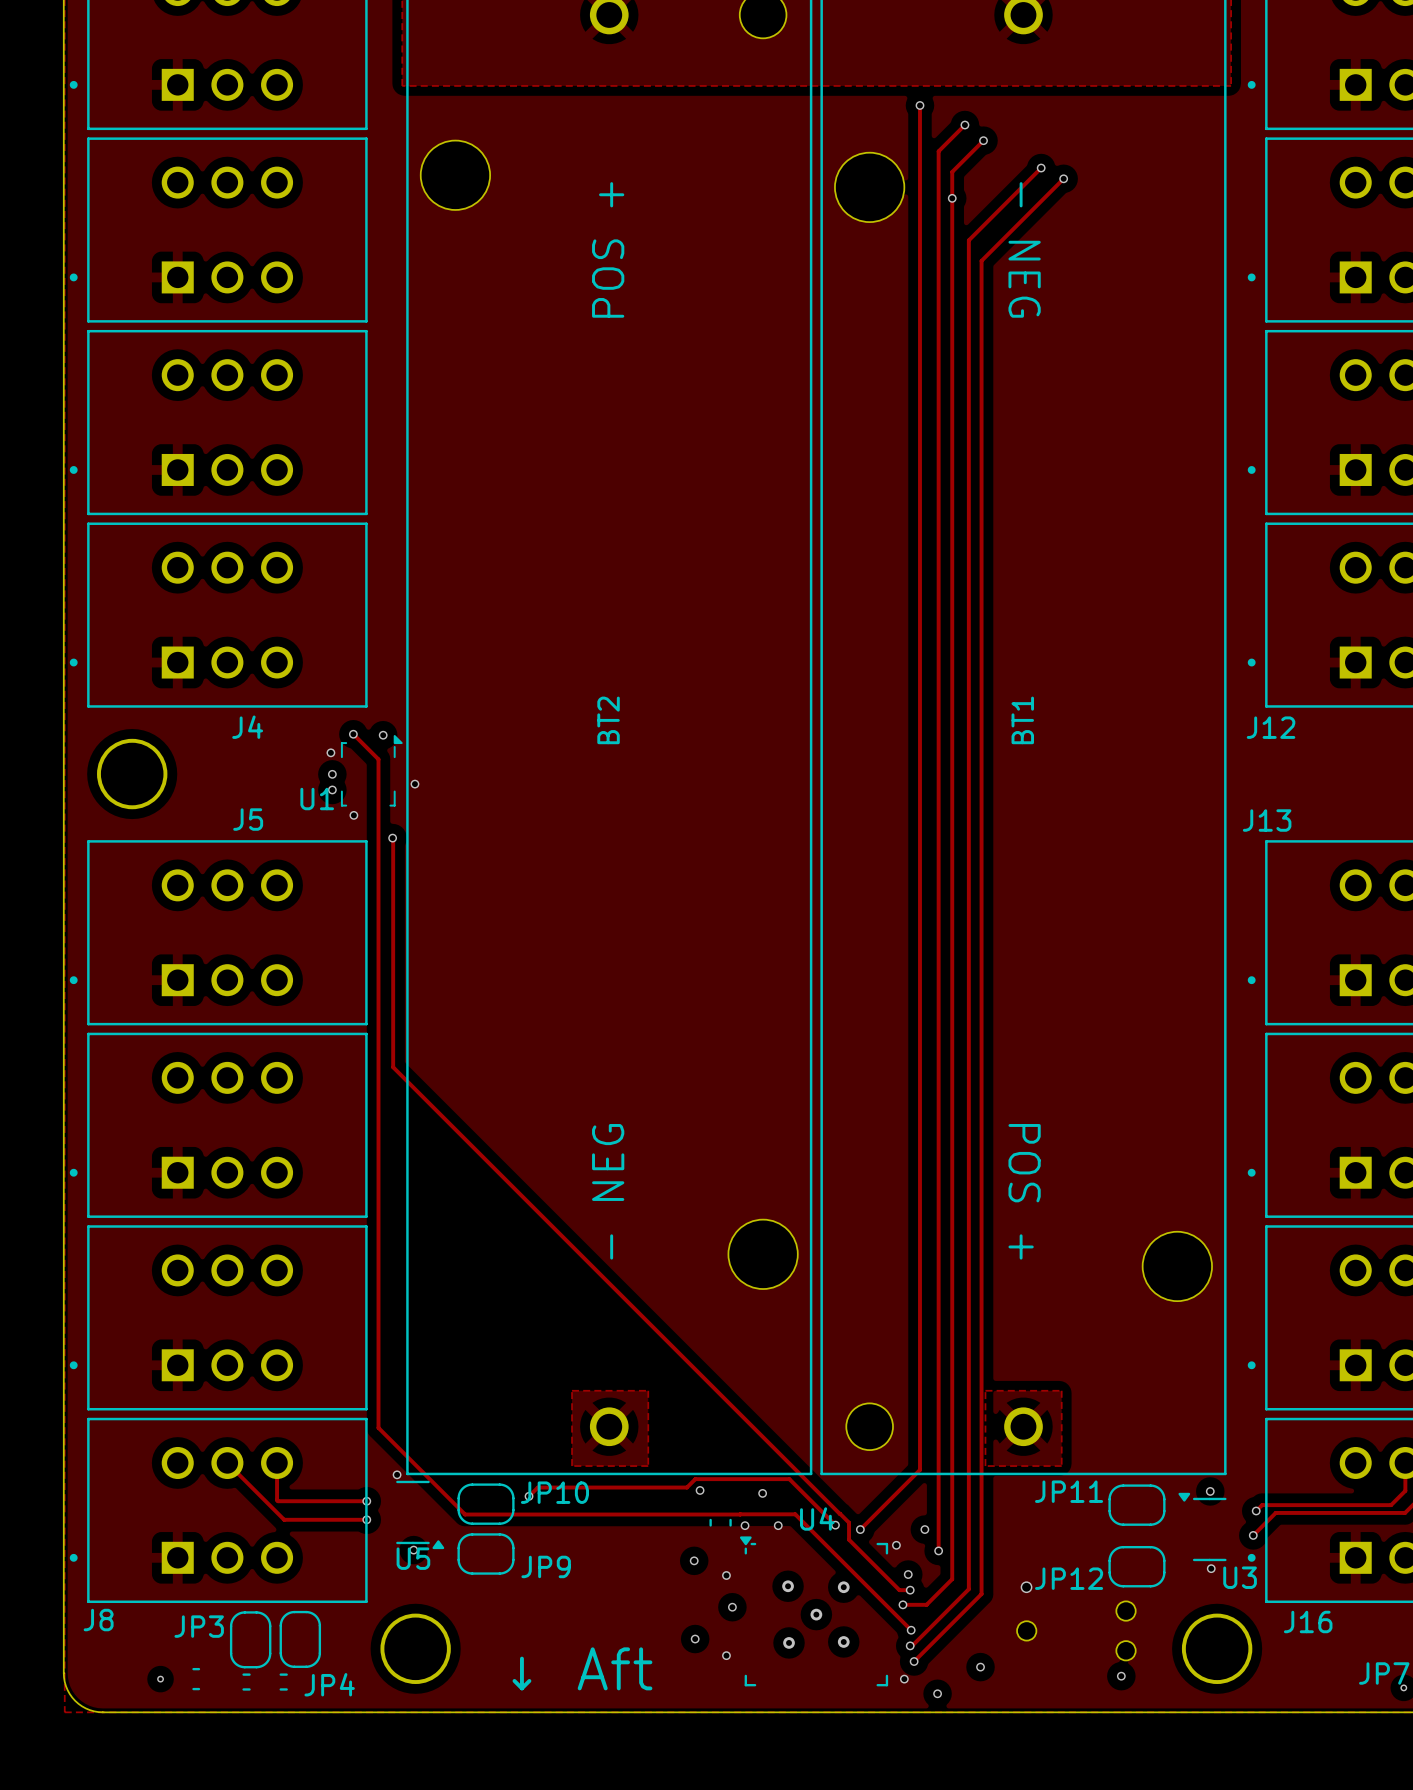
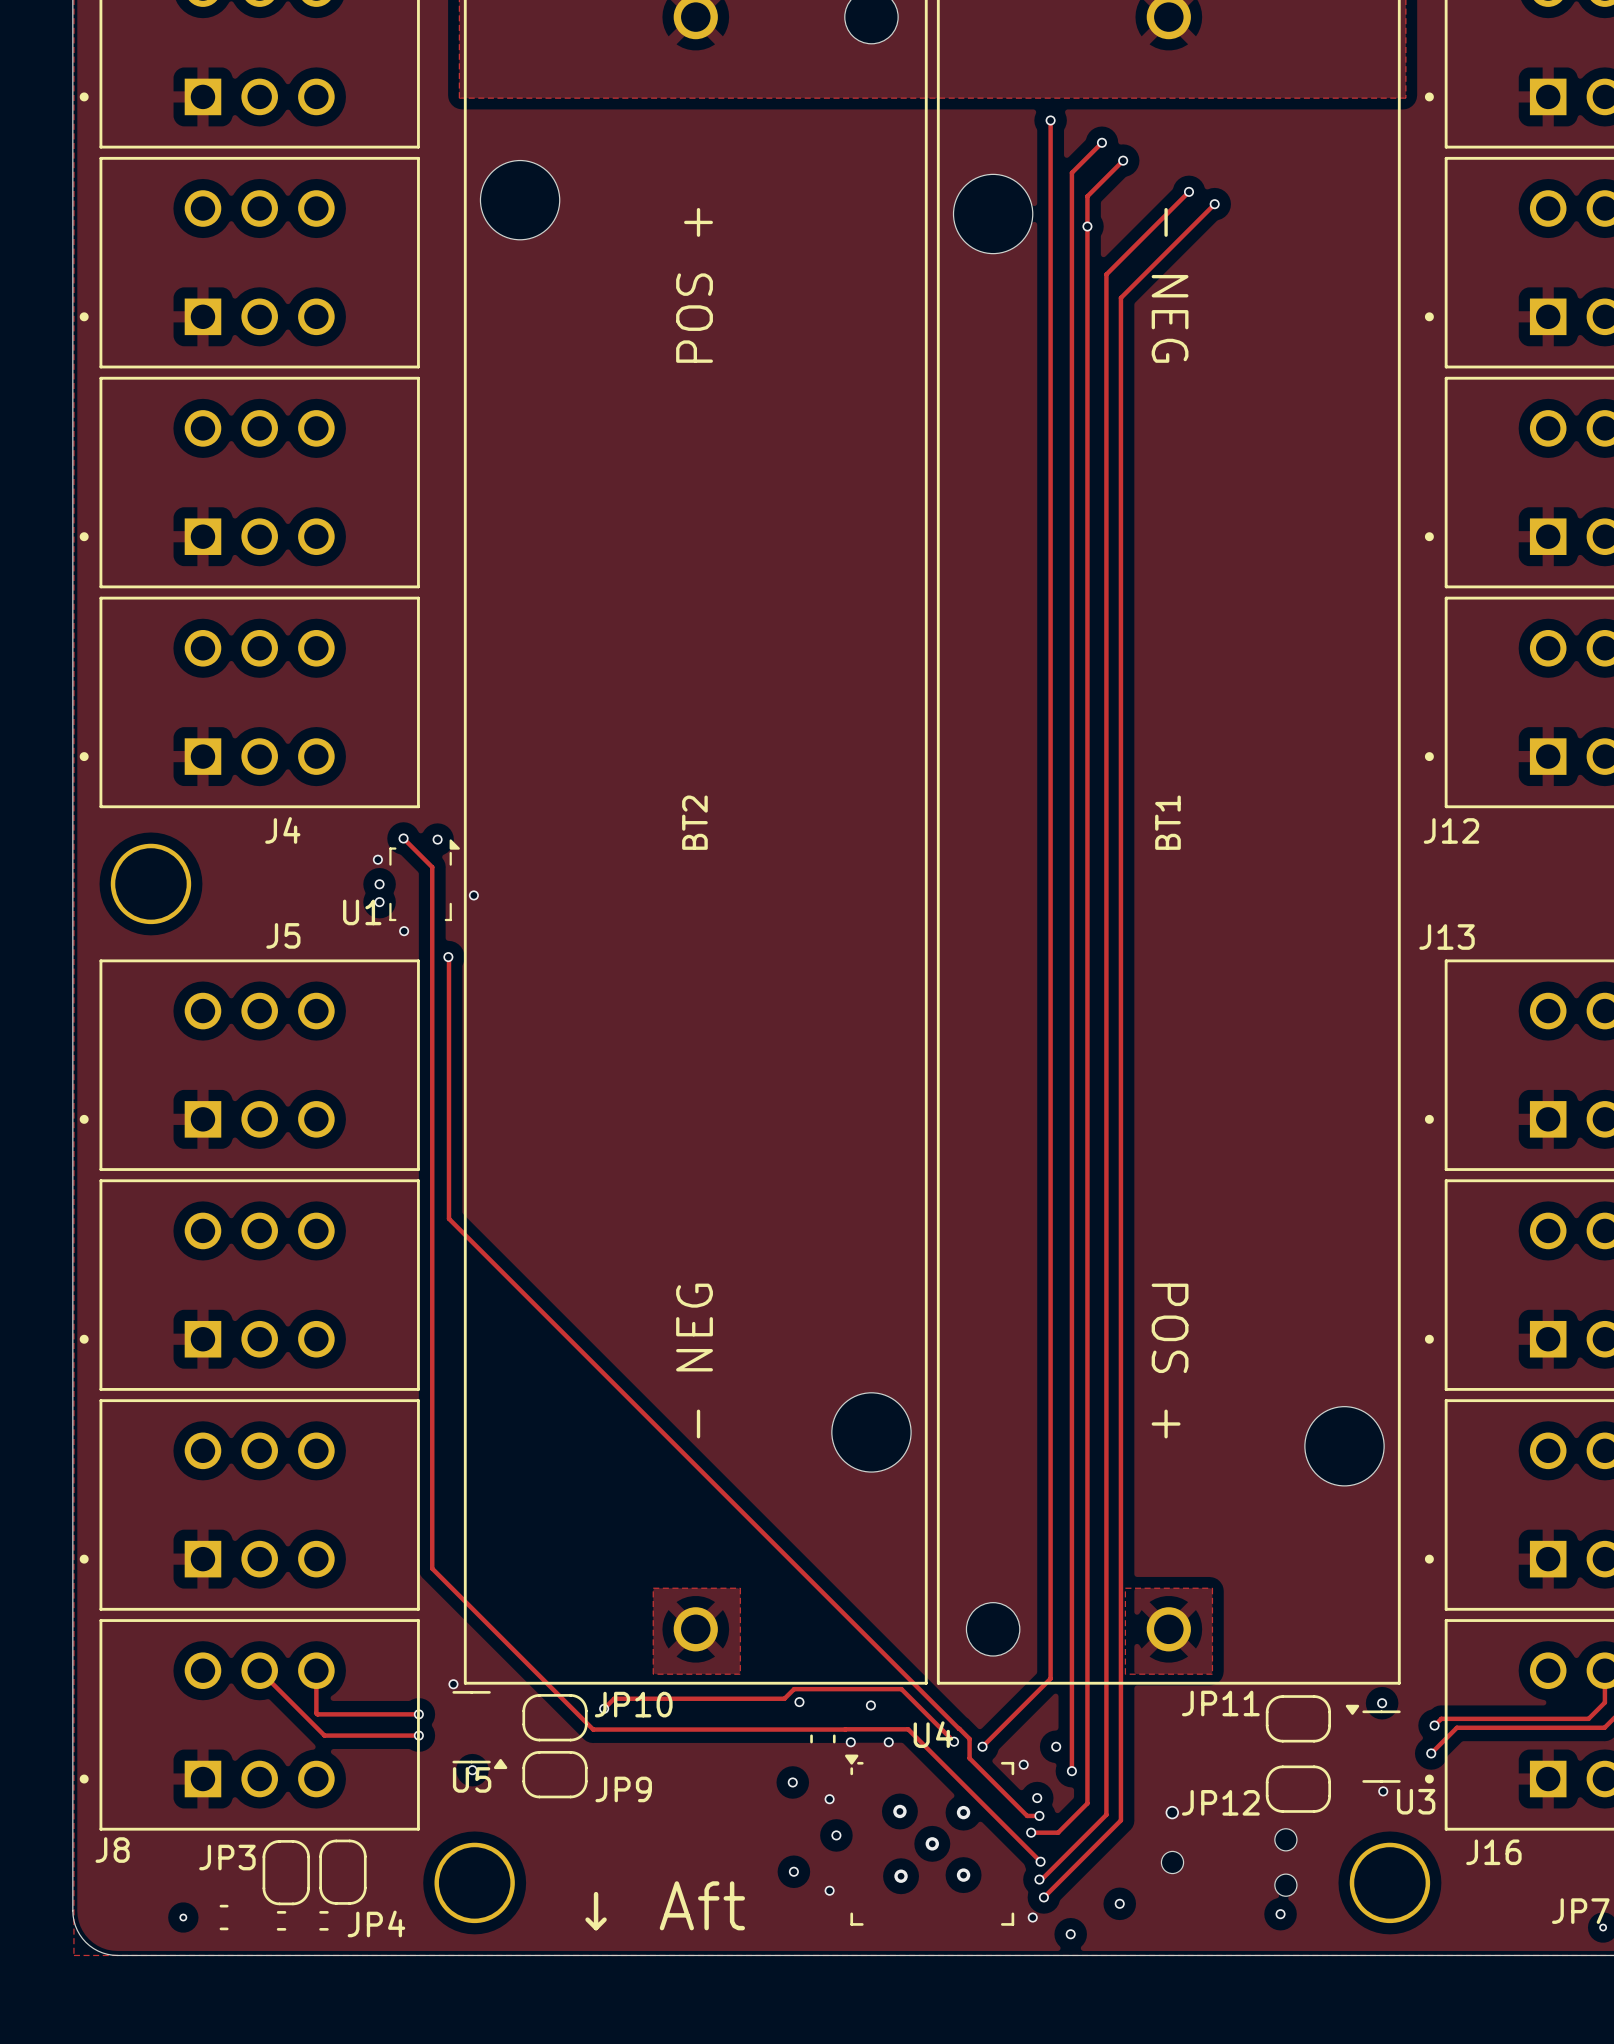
track: (378, 1373) (378, 1427) (465, 1514) (519, 1514) -> (432, 1568) (593, 1729)

